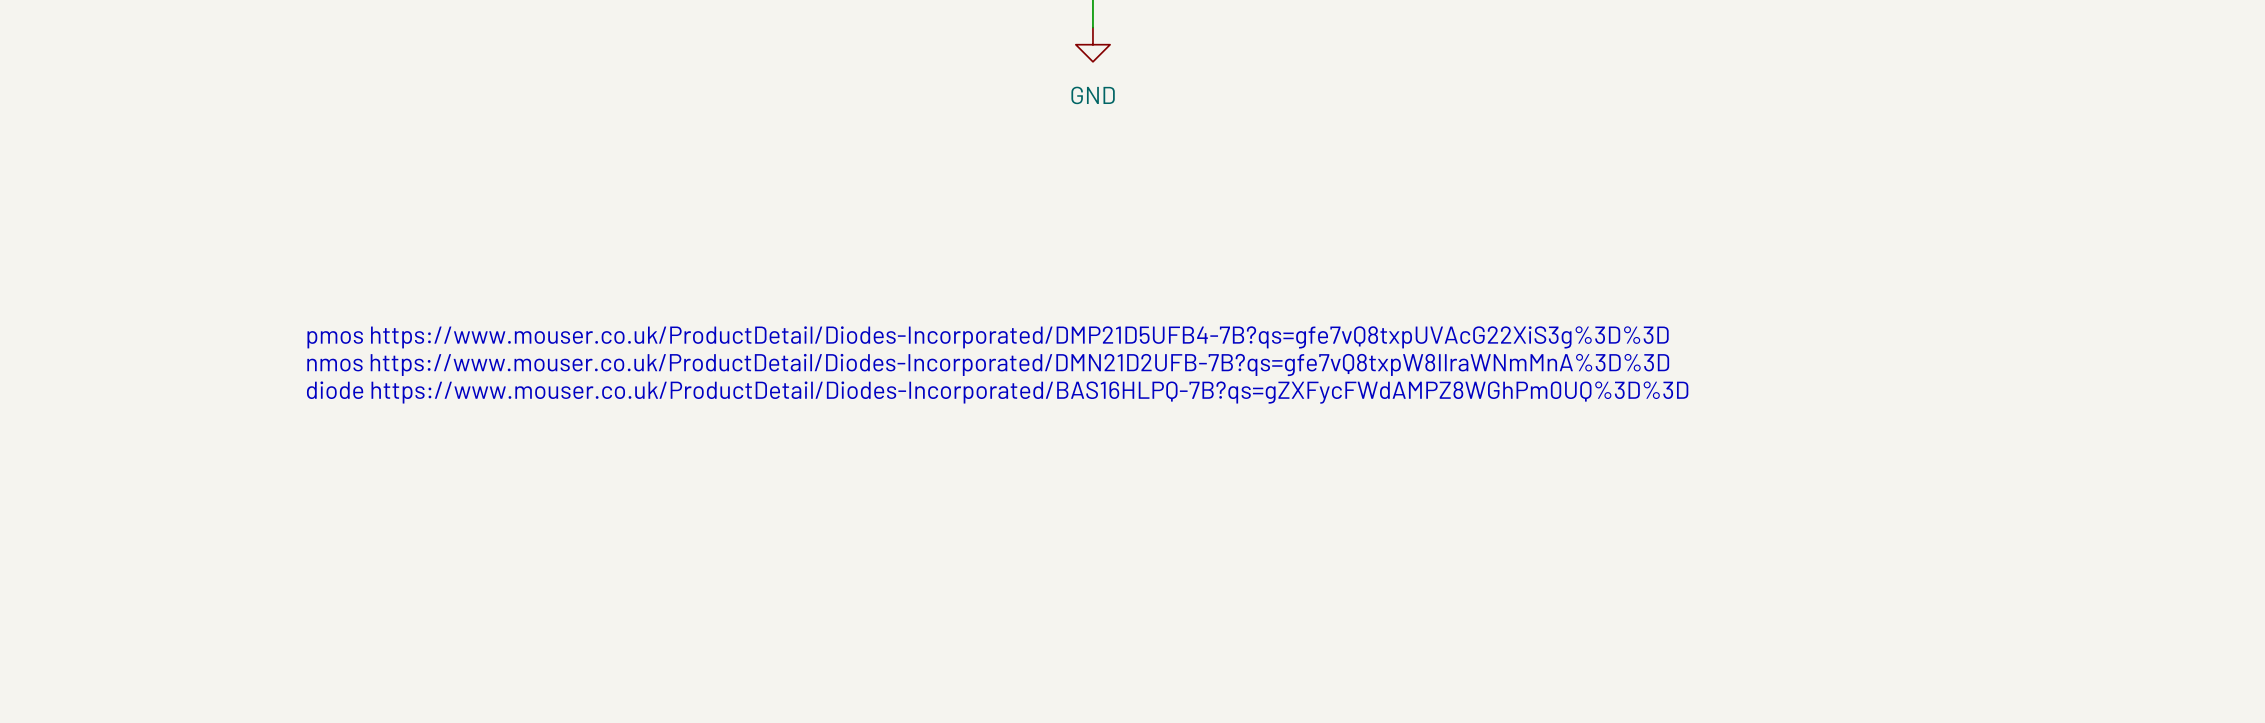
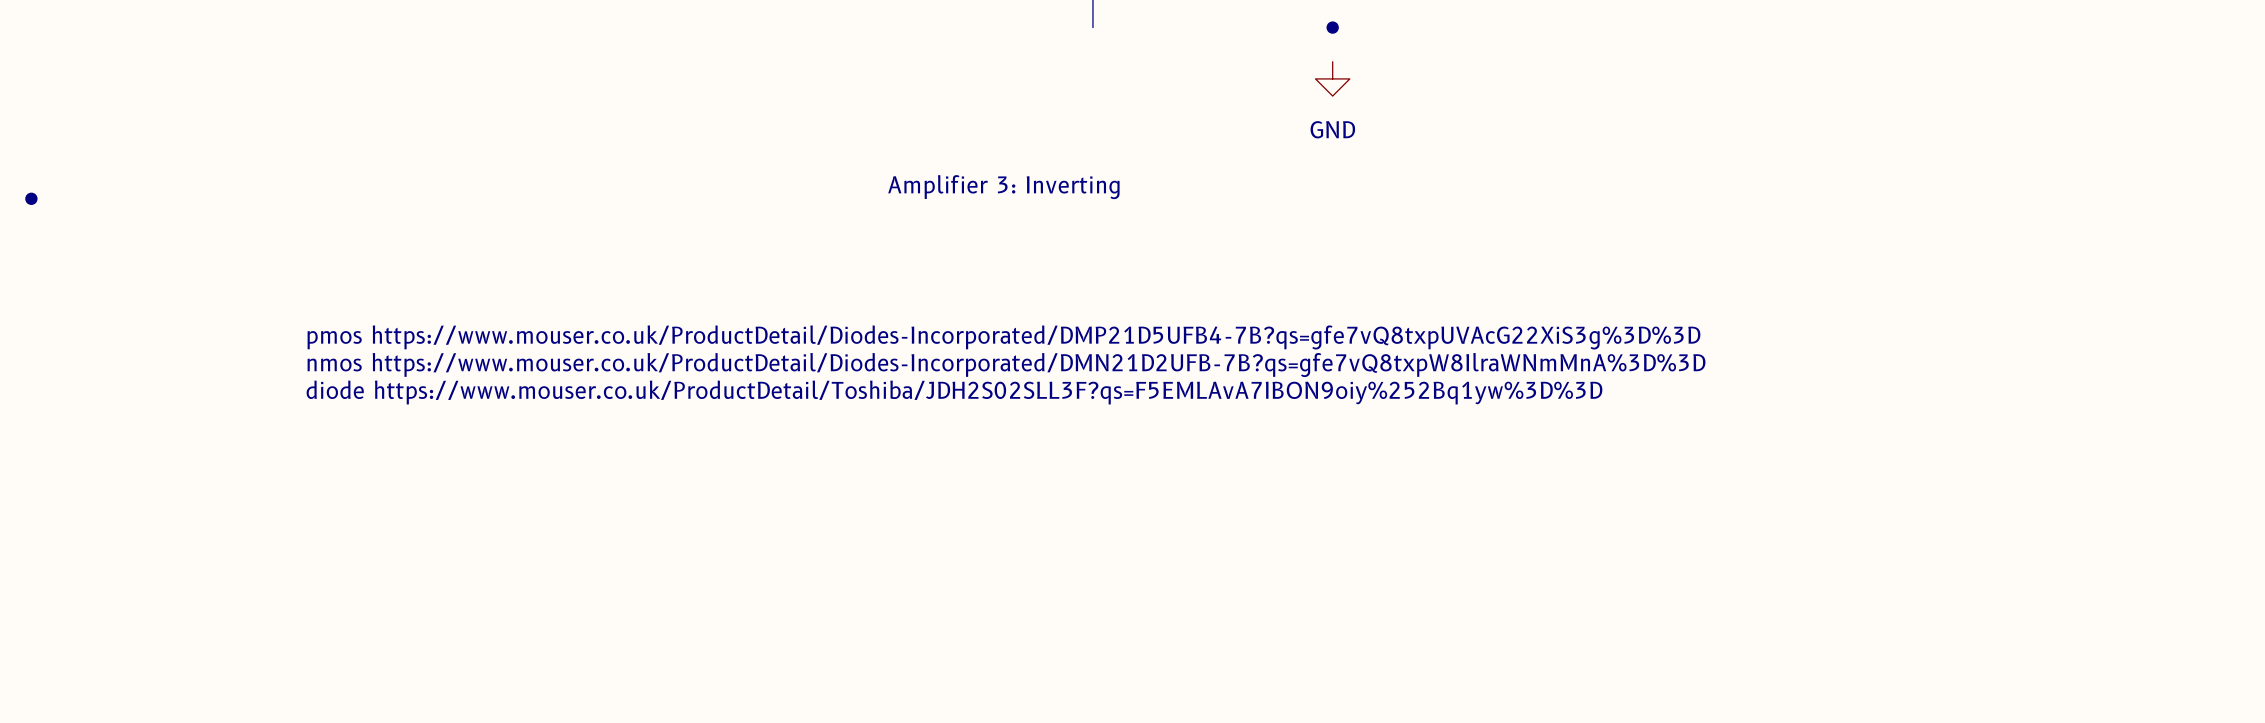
junction: none -> (1332, 27)
power symbol position: GND (1092, 44) -> GND (1332, 78)
text: none -> Amplifier 3: Inverting (1003, 187)
junction: none -> (31, 198)
text: diode https://www.mouser.co.uk/ProductDetail/Diodes-Incorporated/BAS16HLPQ-7B?qs=gZXFycFWdAMPZ8WGhPm0UQ%3D%3D (997, 392) -> diode https://www.mouser.co.uk/ProductDetail/Toshiba/JDH2S02SLL3F?qs=F5EMLAvA7IBON9oiy%252Bq1yw%3D%3D (954, 392)

